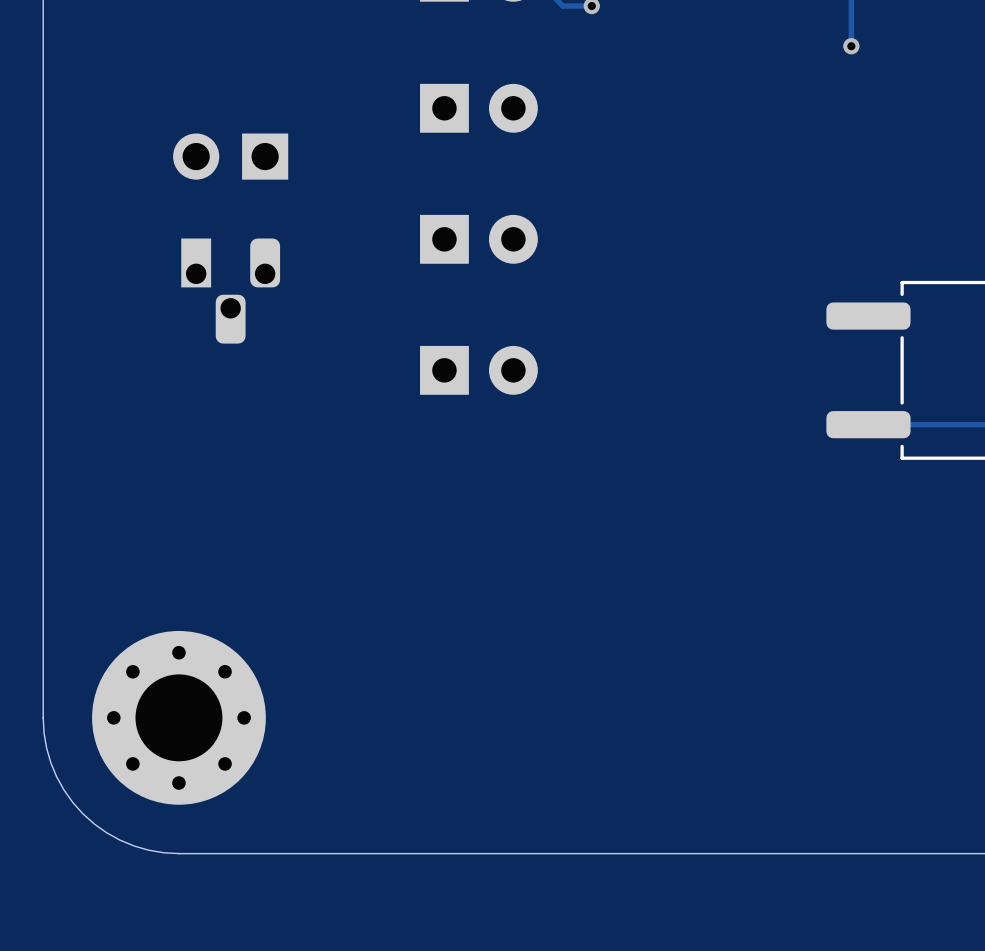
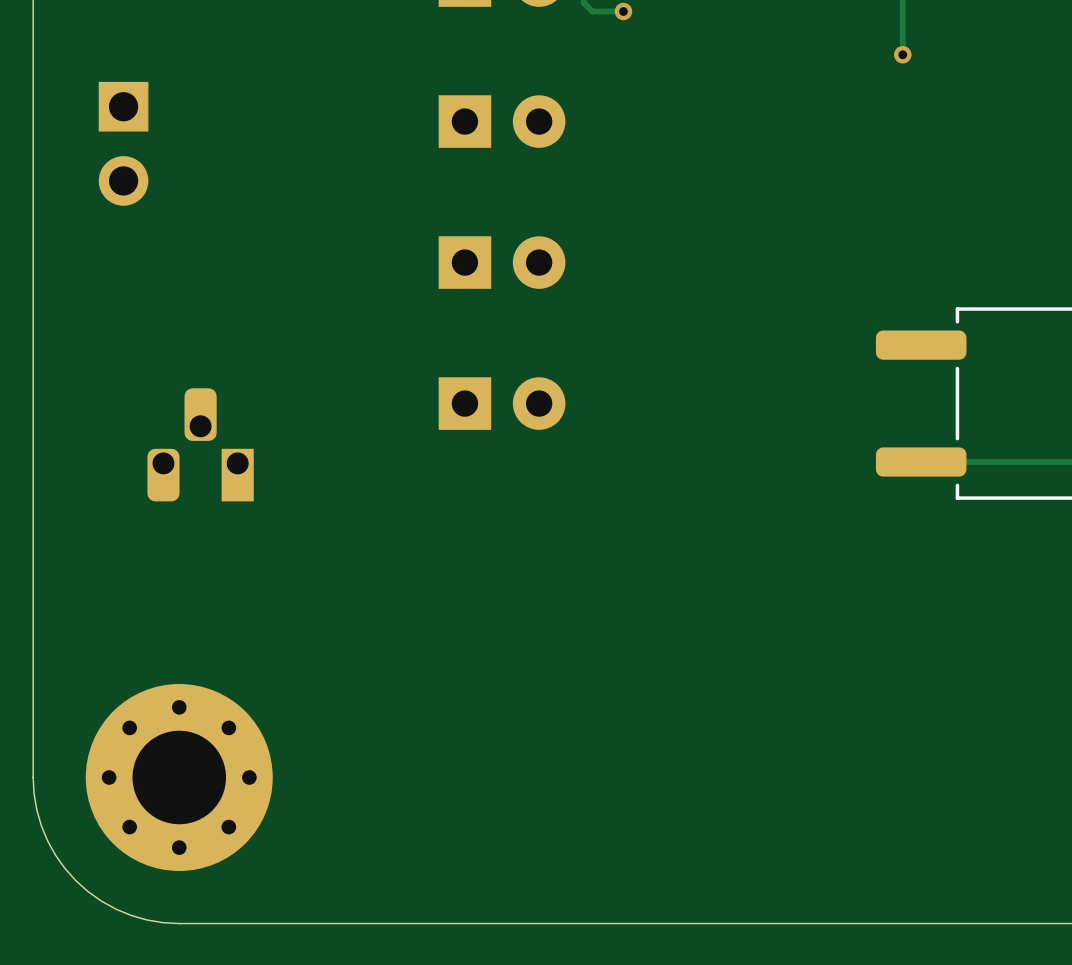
part rotation: 0° (230, 156) -> 90° counterclockwise (123, 143)
part position: (230, 156) -> (123, 143)
part rotation: 0° (230, 291) -> 180° (200, 444)
part position: (230, 291) -> (200, 444)

